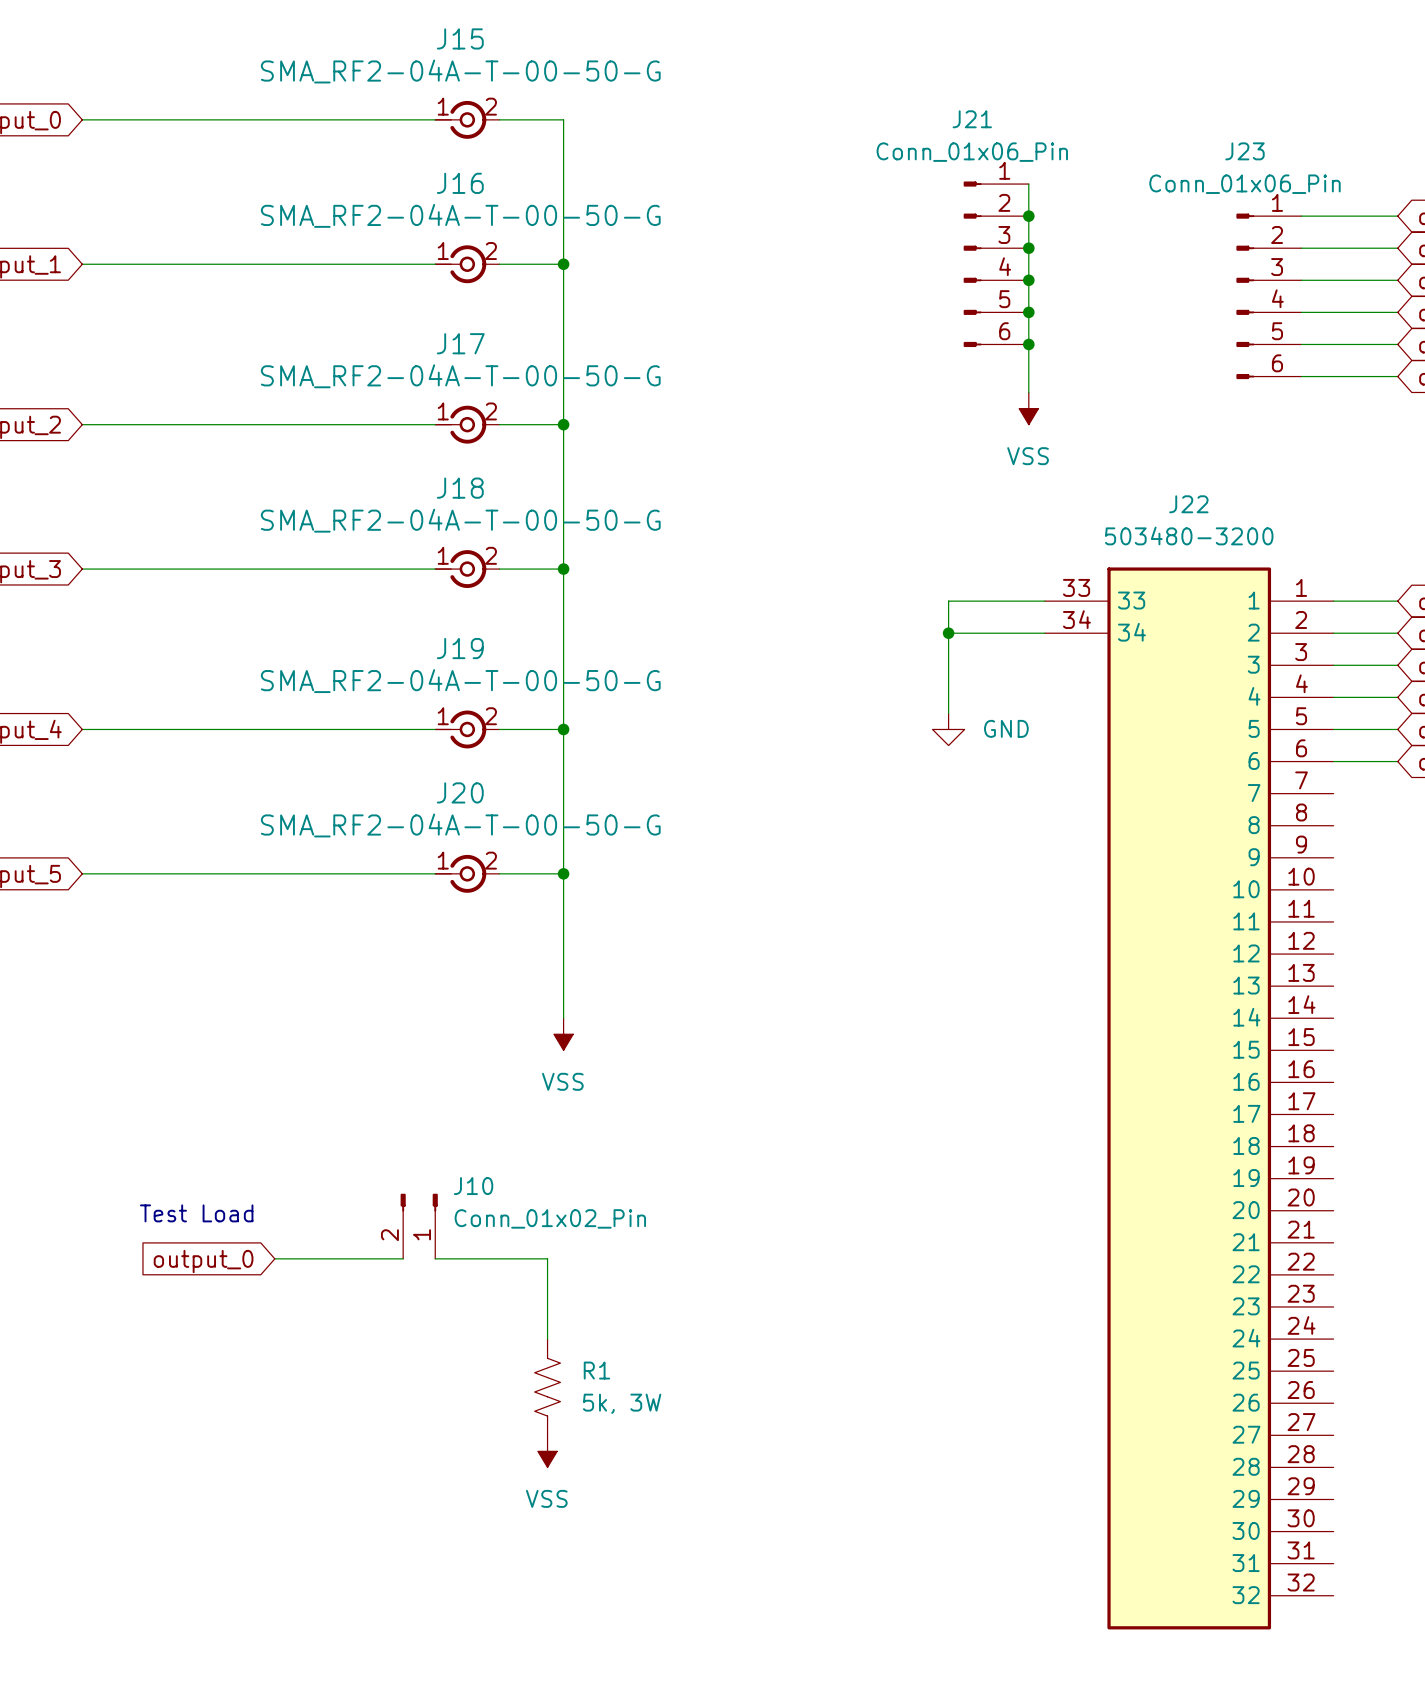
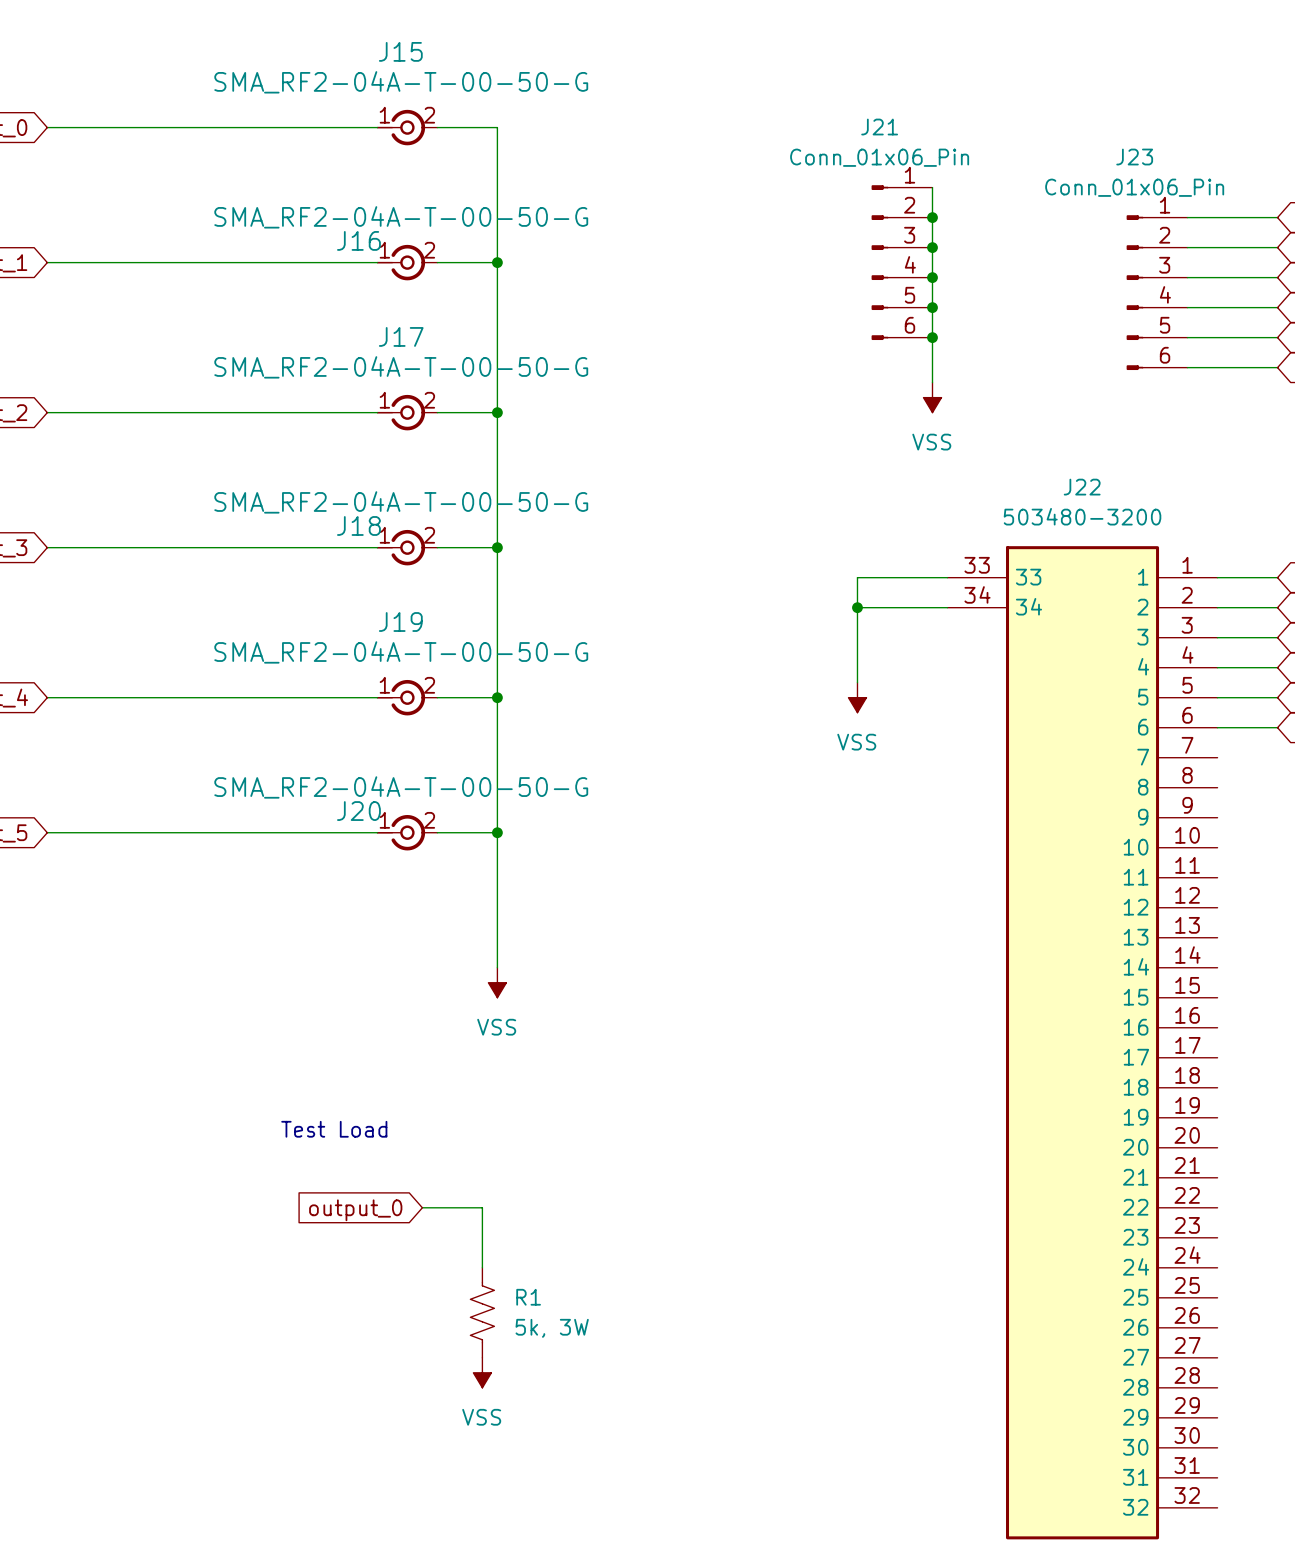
J16 name position: J16 (460, 183) -> J16 (358, 240)
J18 name position: J18 (460, 488) -> J18 (358, 525)
power symbol: GND (948, 729) -> VSS (857, 697)
J20 name position: J20 (460, 792) -> J20 (358, 811)
text position: Test Load (196, 1213) -> Test Load (334, 1129)
J10: Conn_01x02_Pin (419, 1226) -> none
wire: (274, 1258) (403, 1258) -> none
wire: (435, 1258) (547, 1258) (547, 1274) -> (422, 1207) (482, 1207)
global label position: output_0 (203, 1261) -> output_0 (355, 1210)

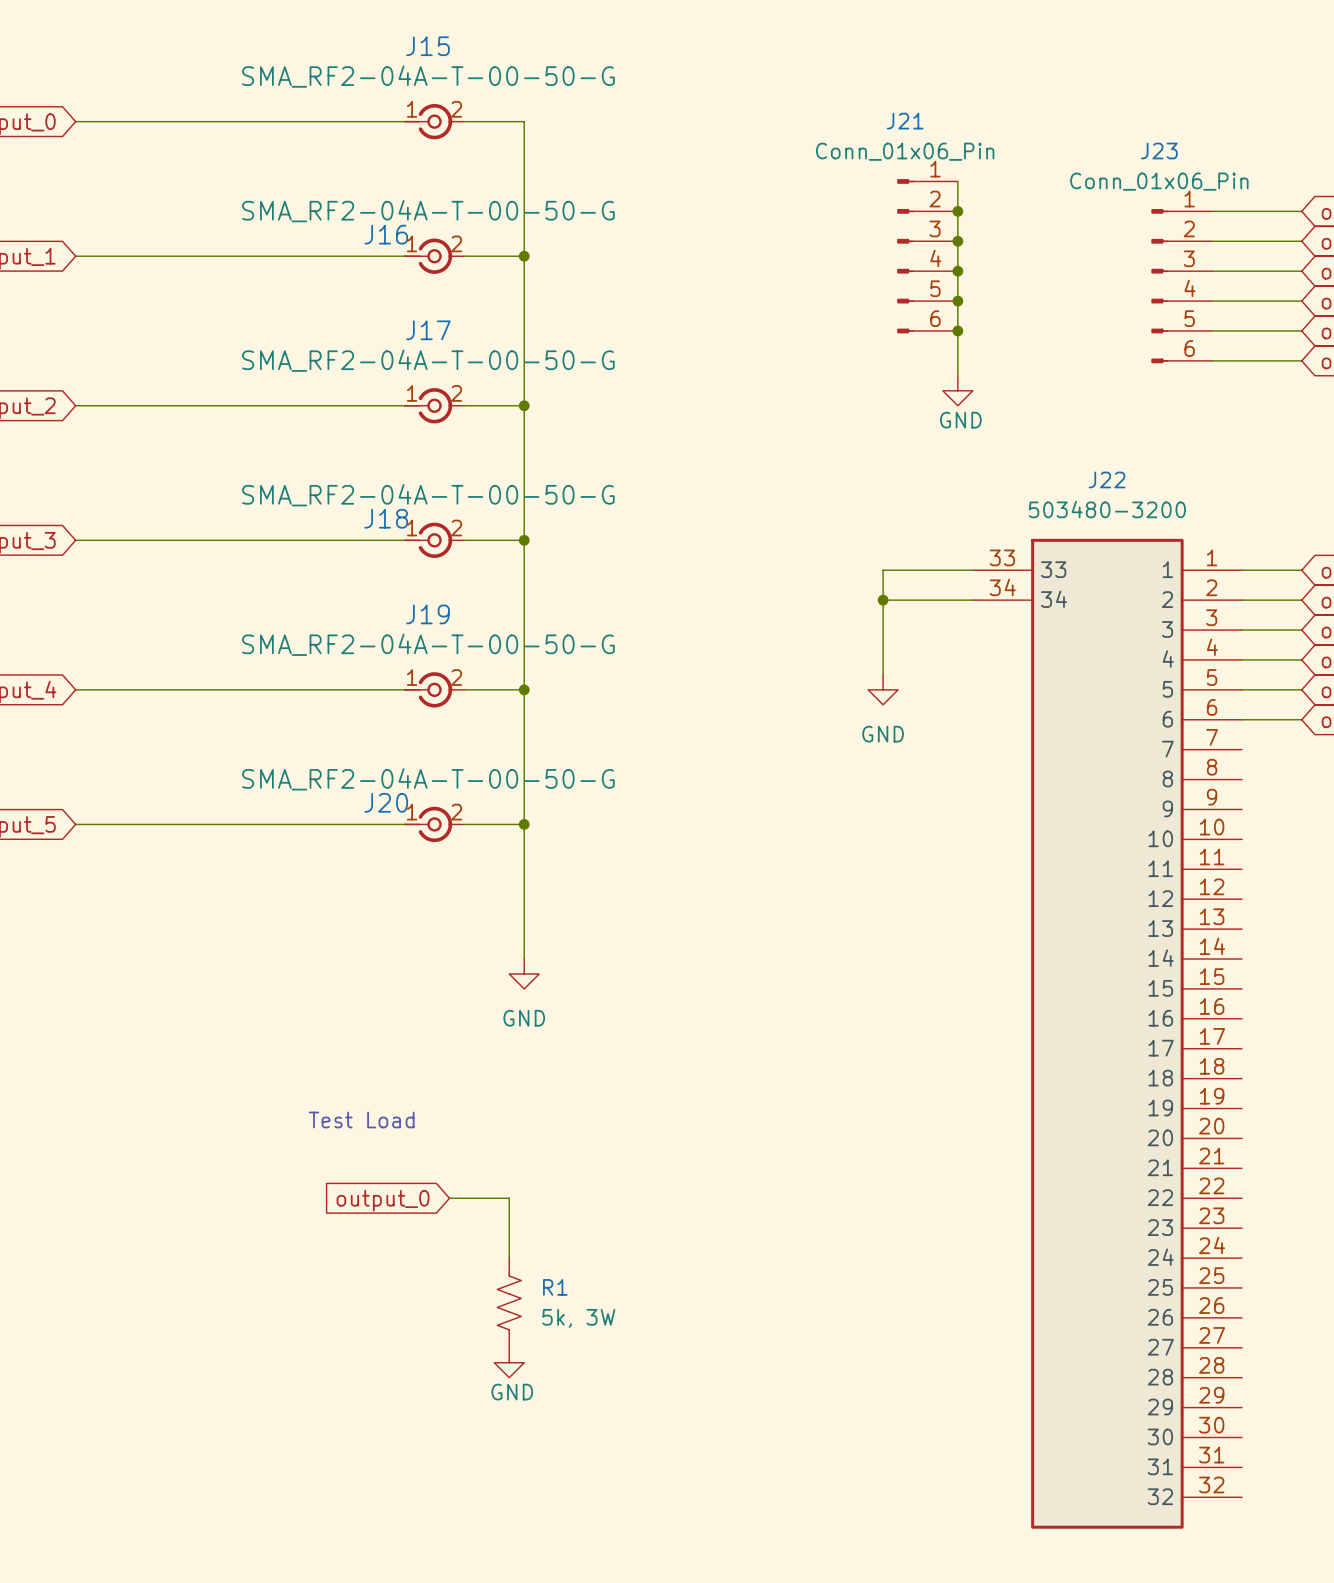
power symbol: VSS (932, 397) -> GND (957, 390)
power symbol: VSS (857, 697) -> GND (883, 689)
power symbol: VSS (497, 982) -> GND (524, 973)
power symbol: VSS (482, 1372) -> GND (509, 1362)

